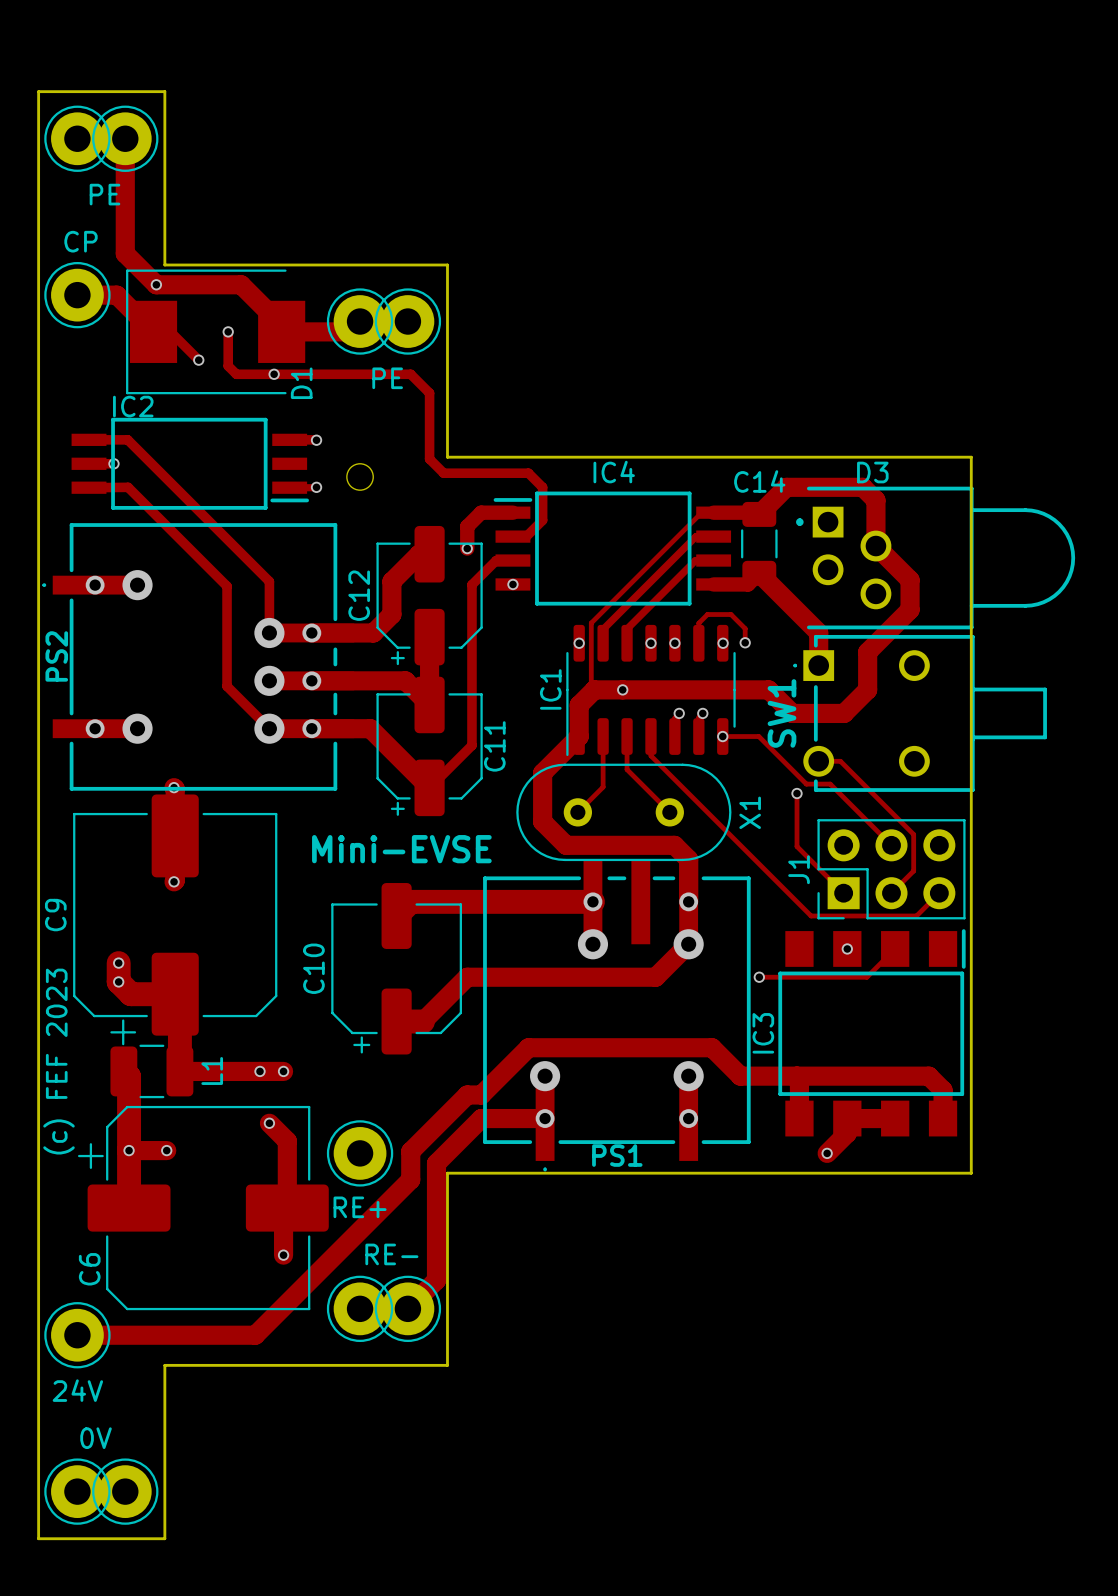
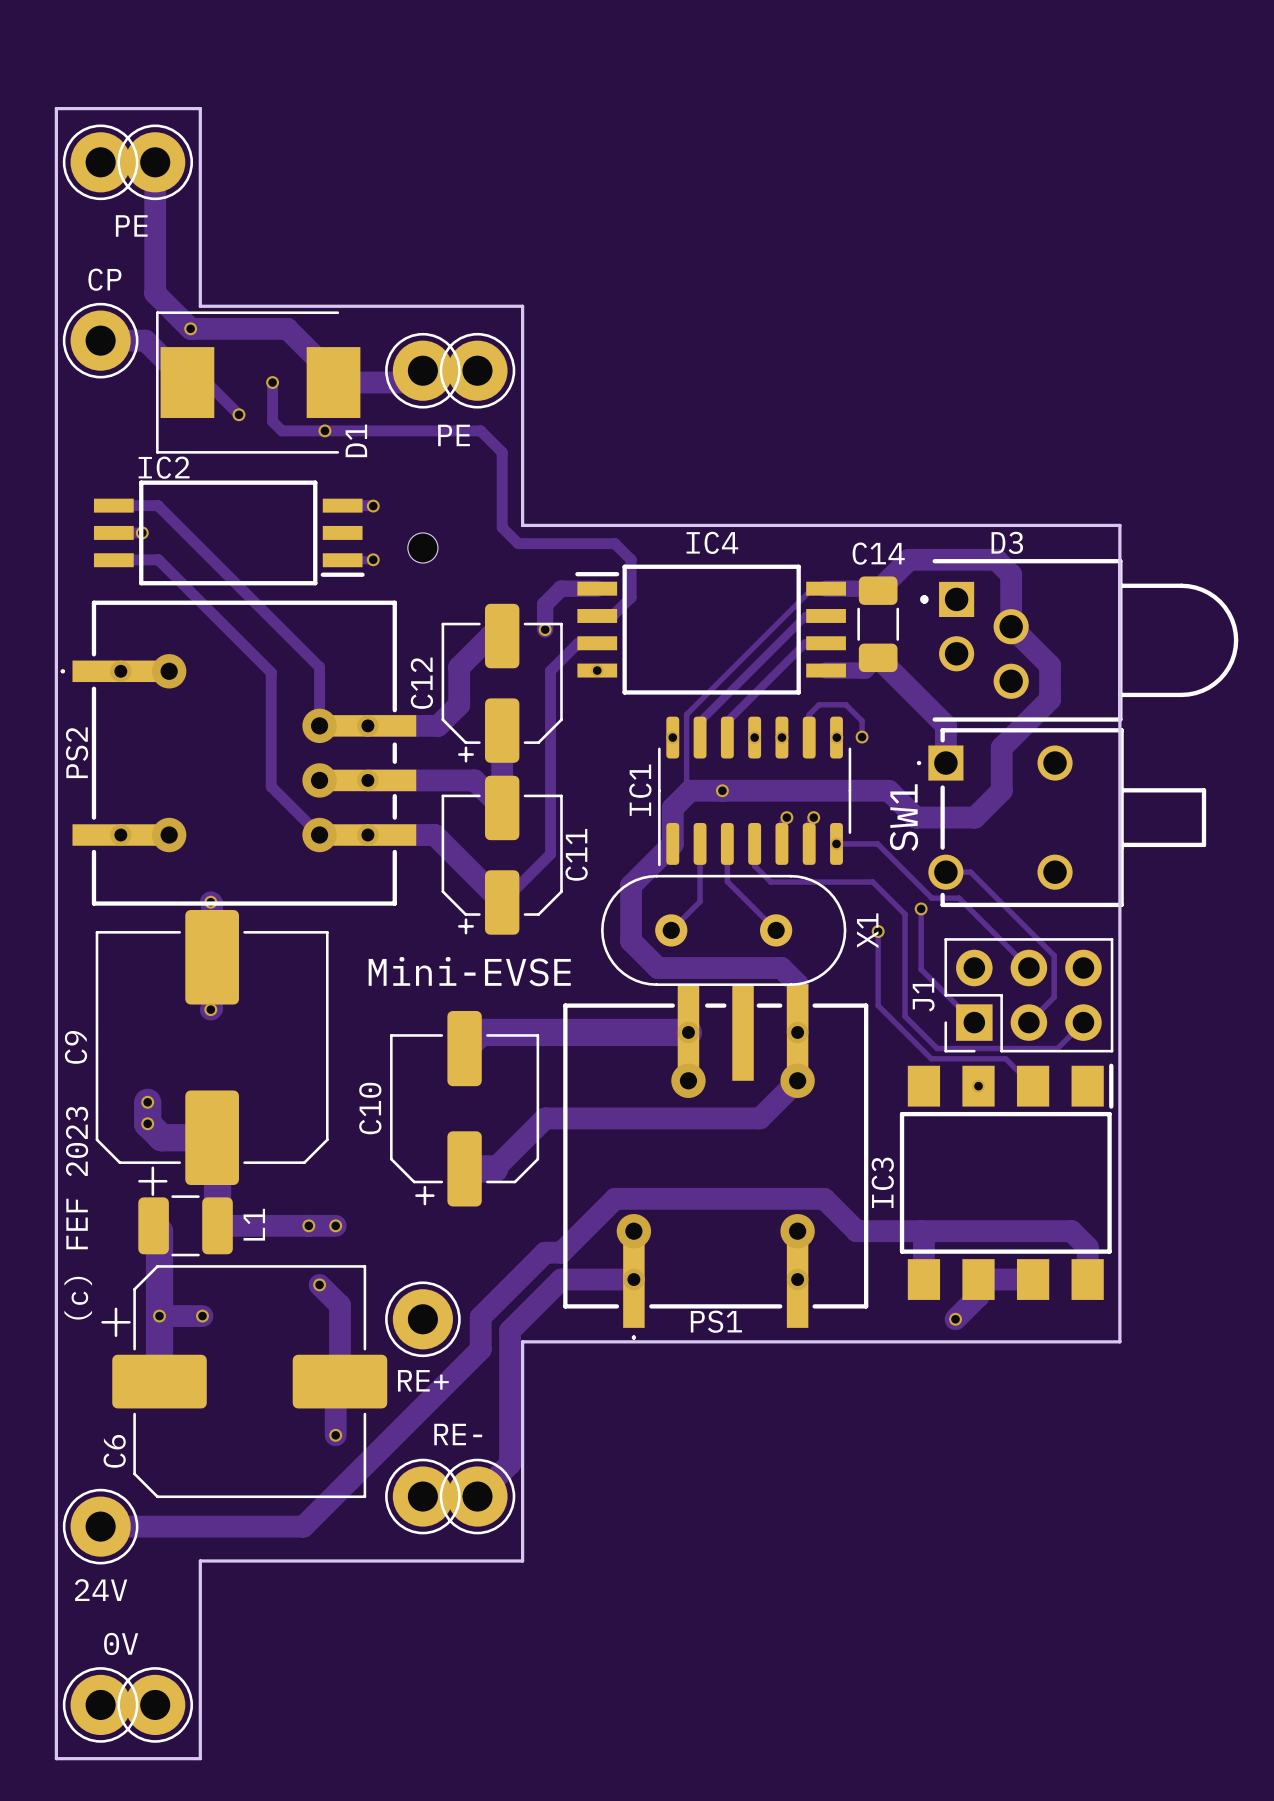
track: (665, 769) (782, 887) -> (770, 882) (872, 882) (905, 914) (905, 1016)
via: none -> (878, 931)
track: (895, 948) (866, 977) (759, 977) -> (1033, 1086) (1005, 1058) (931, 1058) (878, 1005) (878, 931)
via: (759, 977) -> none

